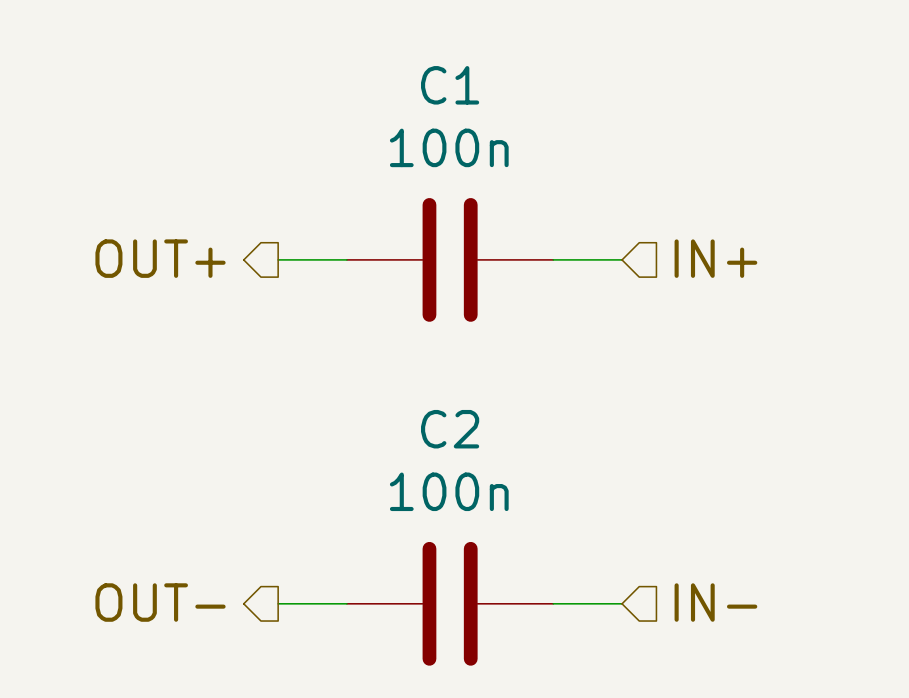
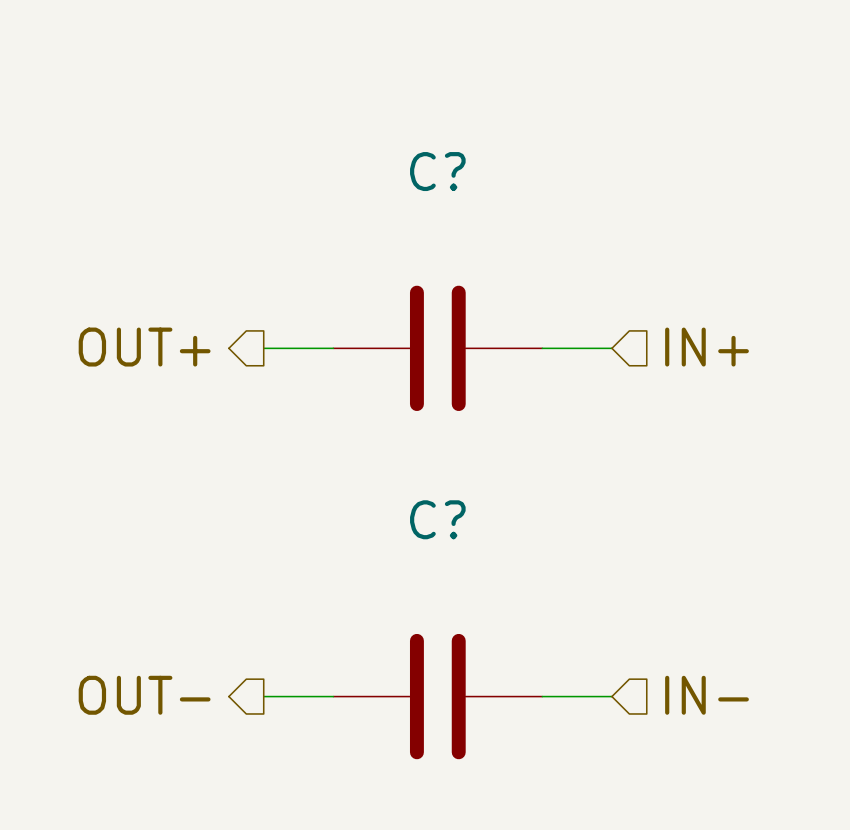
C1 name: C1 (450, 85) -> C? (437, 171)
C1 value: 100n (449, 147) -> none
C2 name: C2 (450, 429) -> C? (437, 519)
C2 value: 100n (449, 491) -> none

